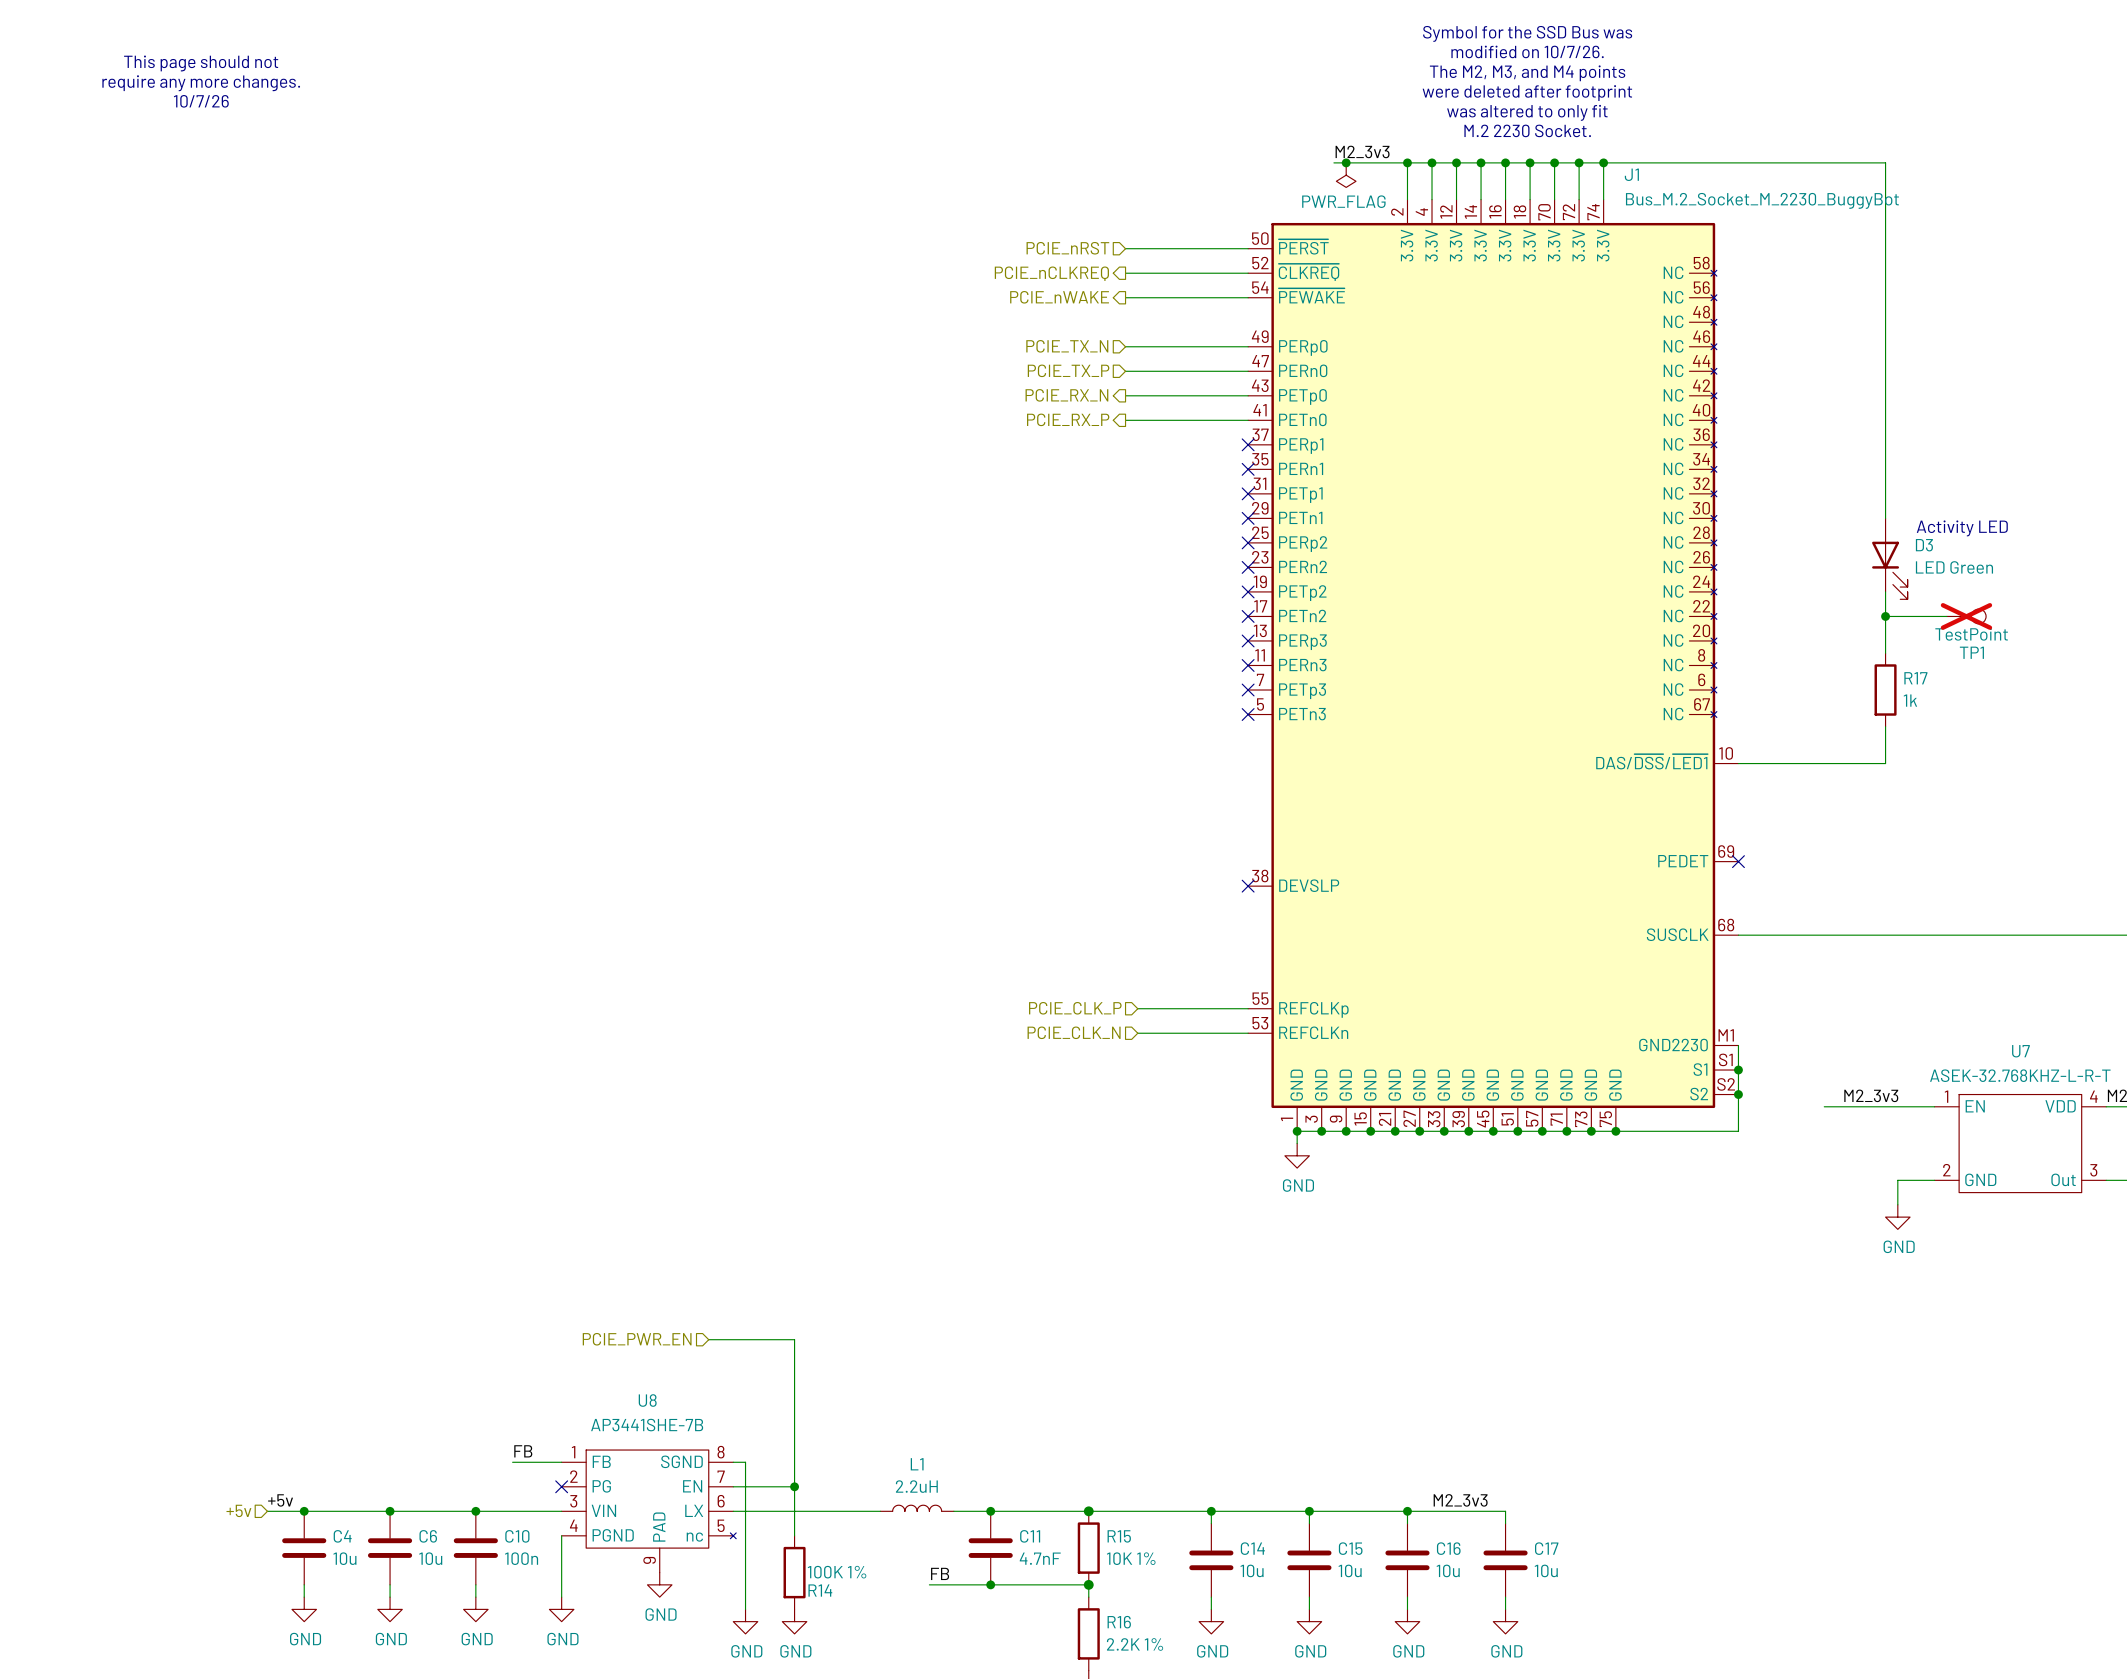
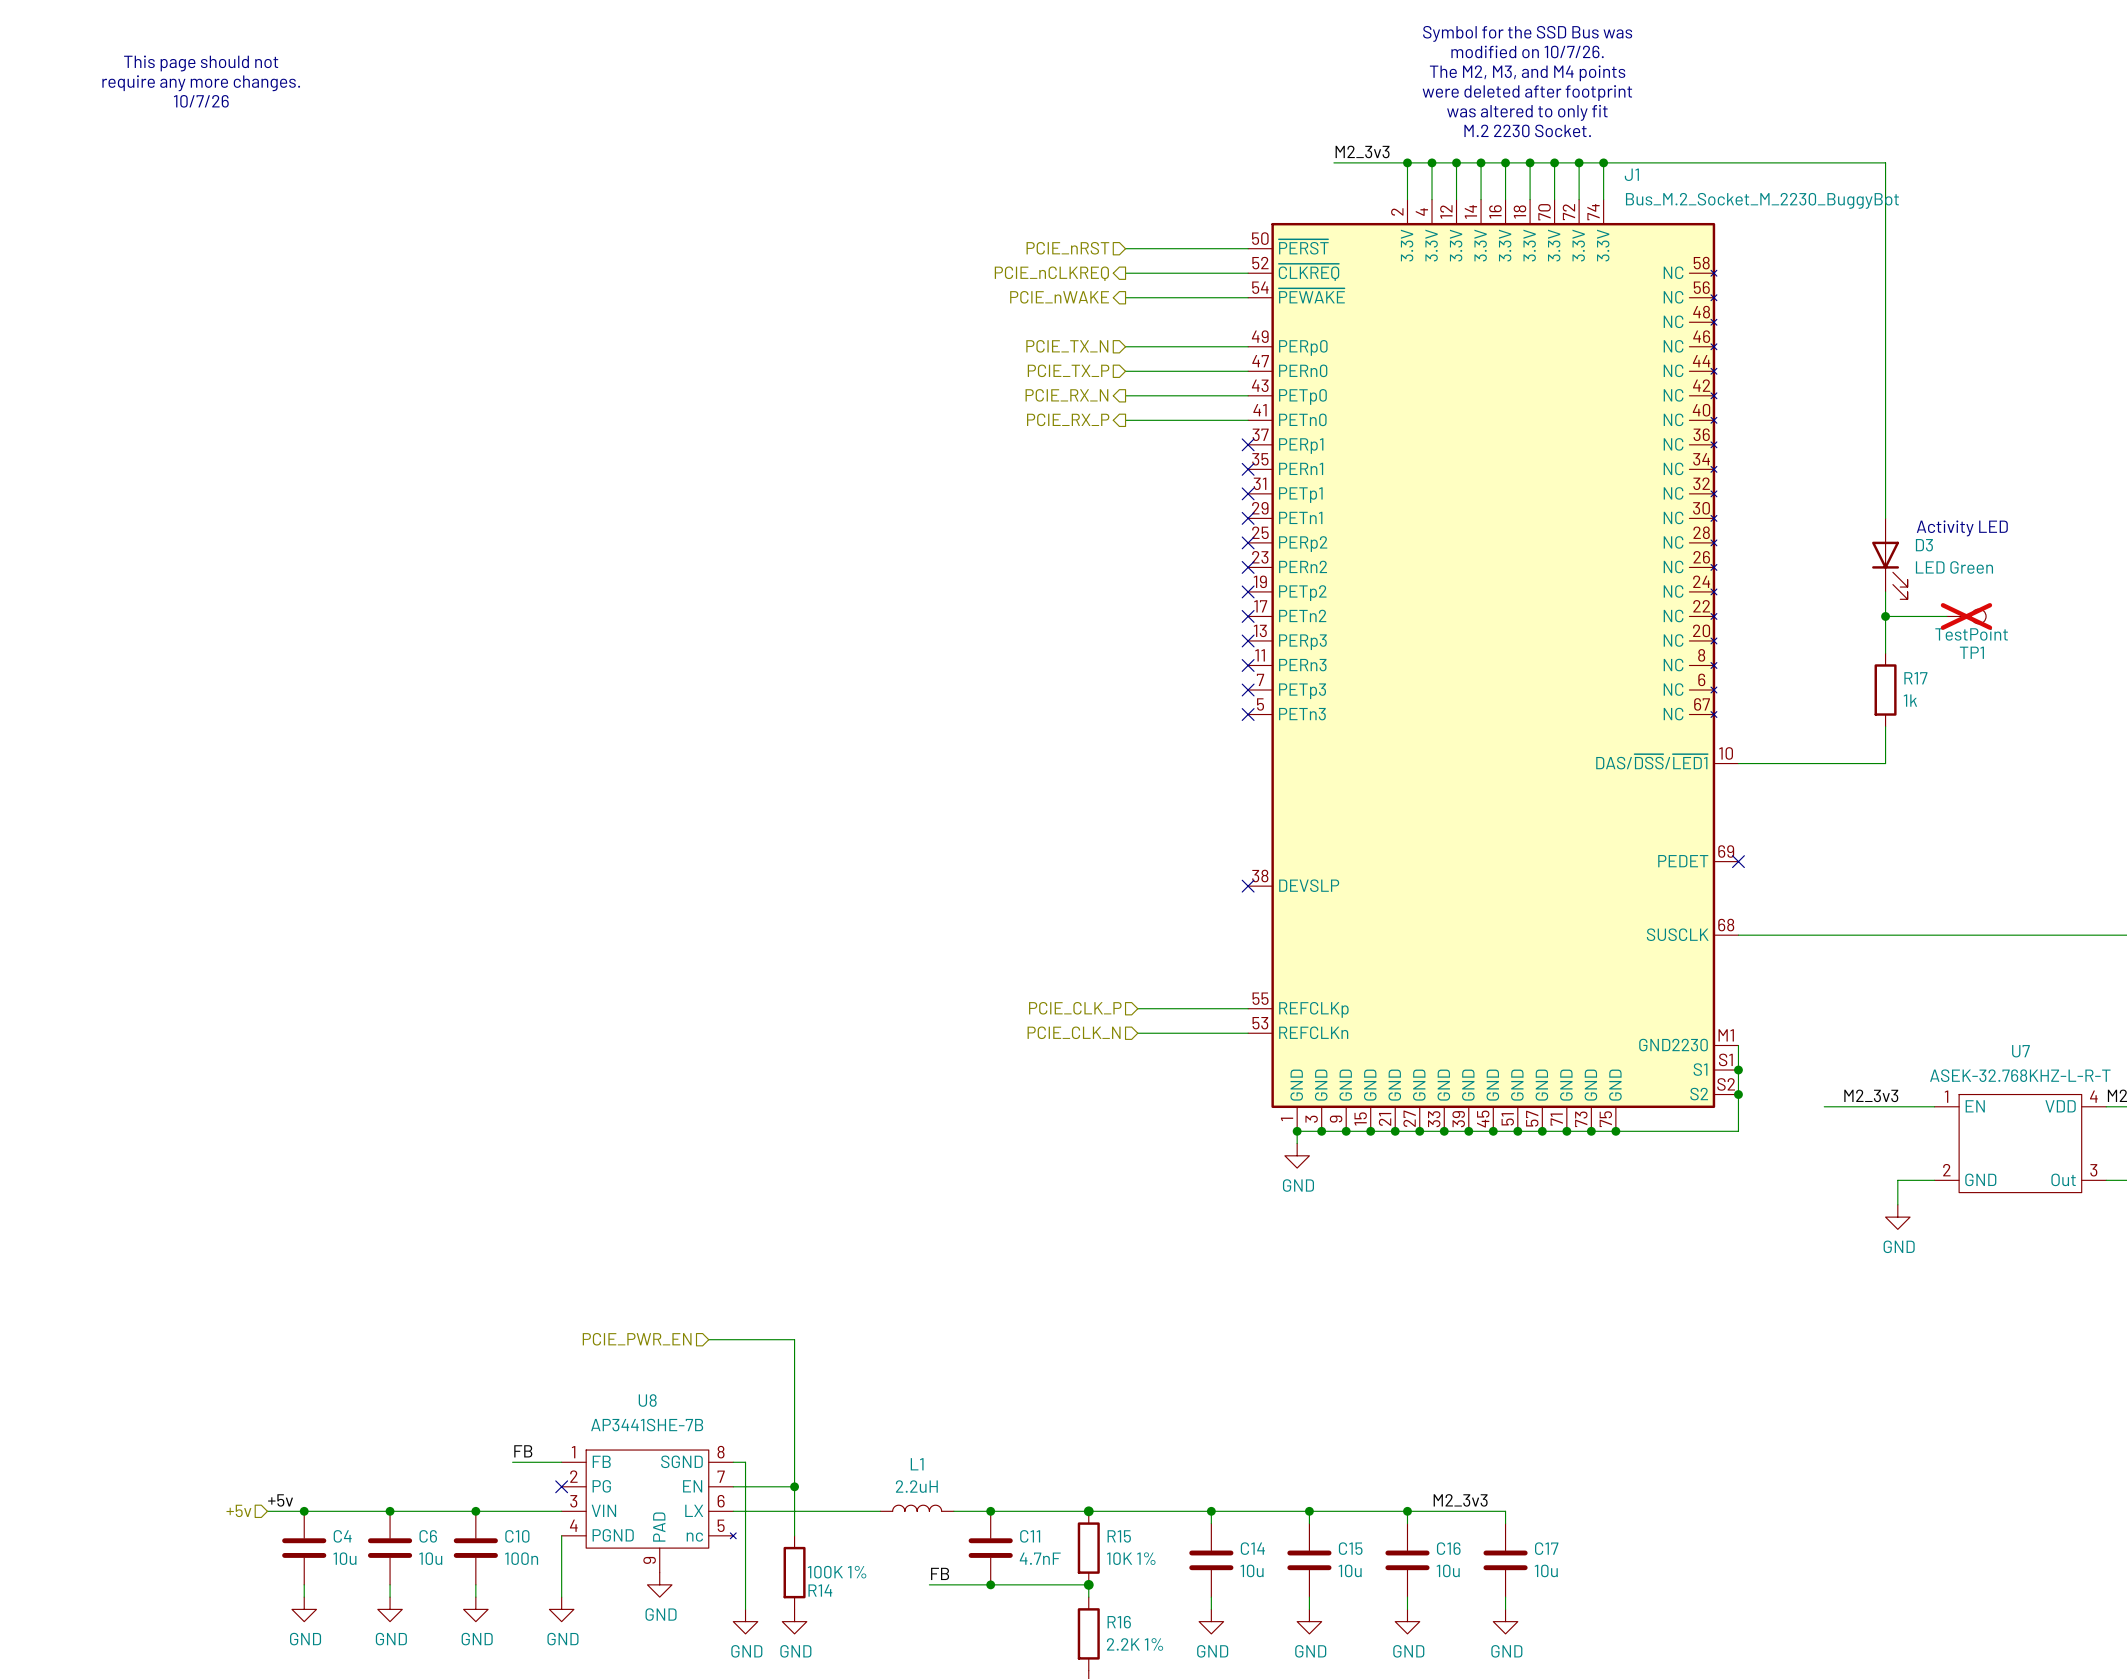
junction: (1346, 162) -> none
power symbol: PWR_FLAG (1346, 175) -> none

